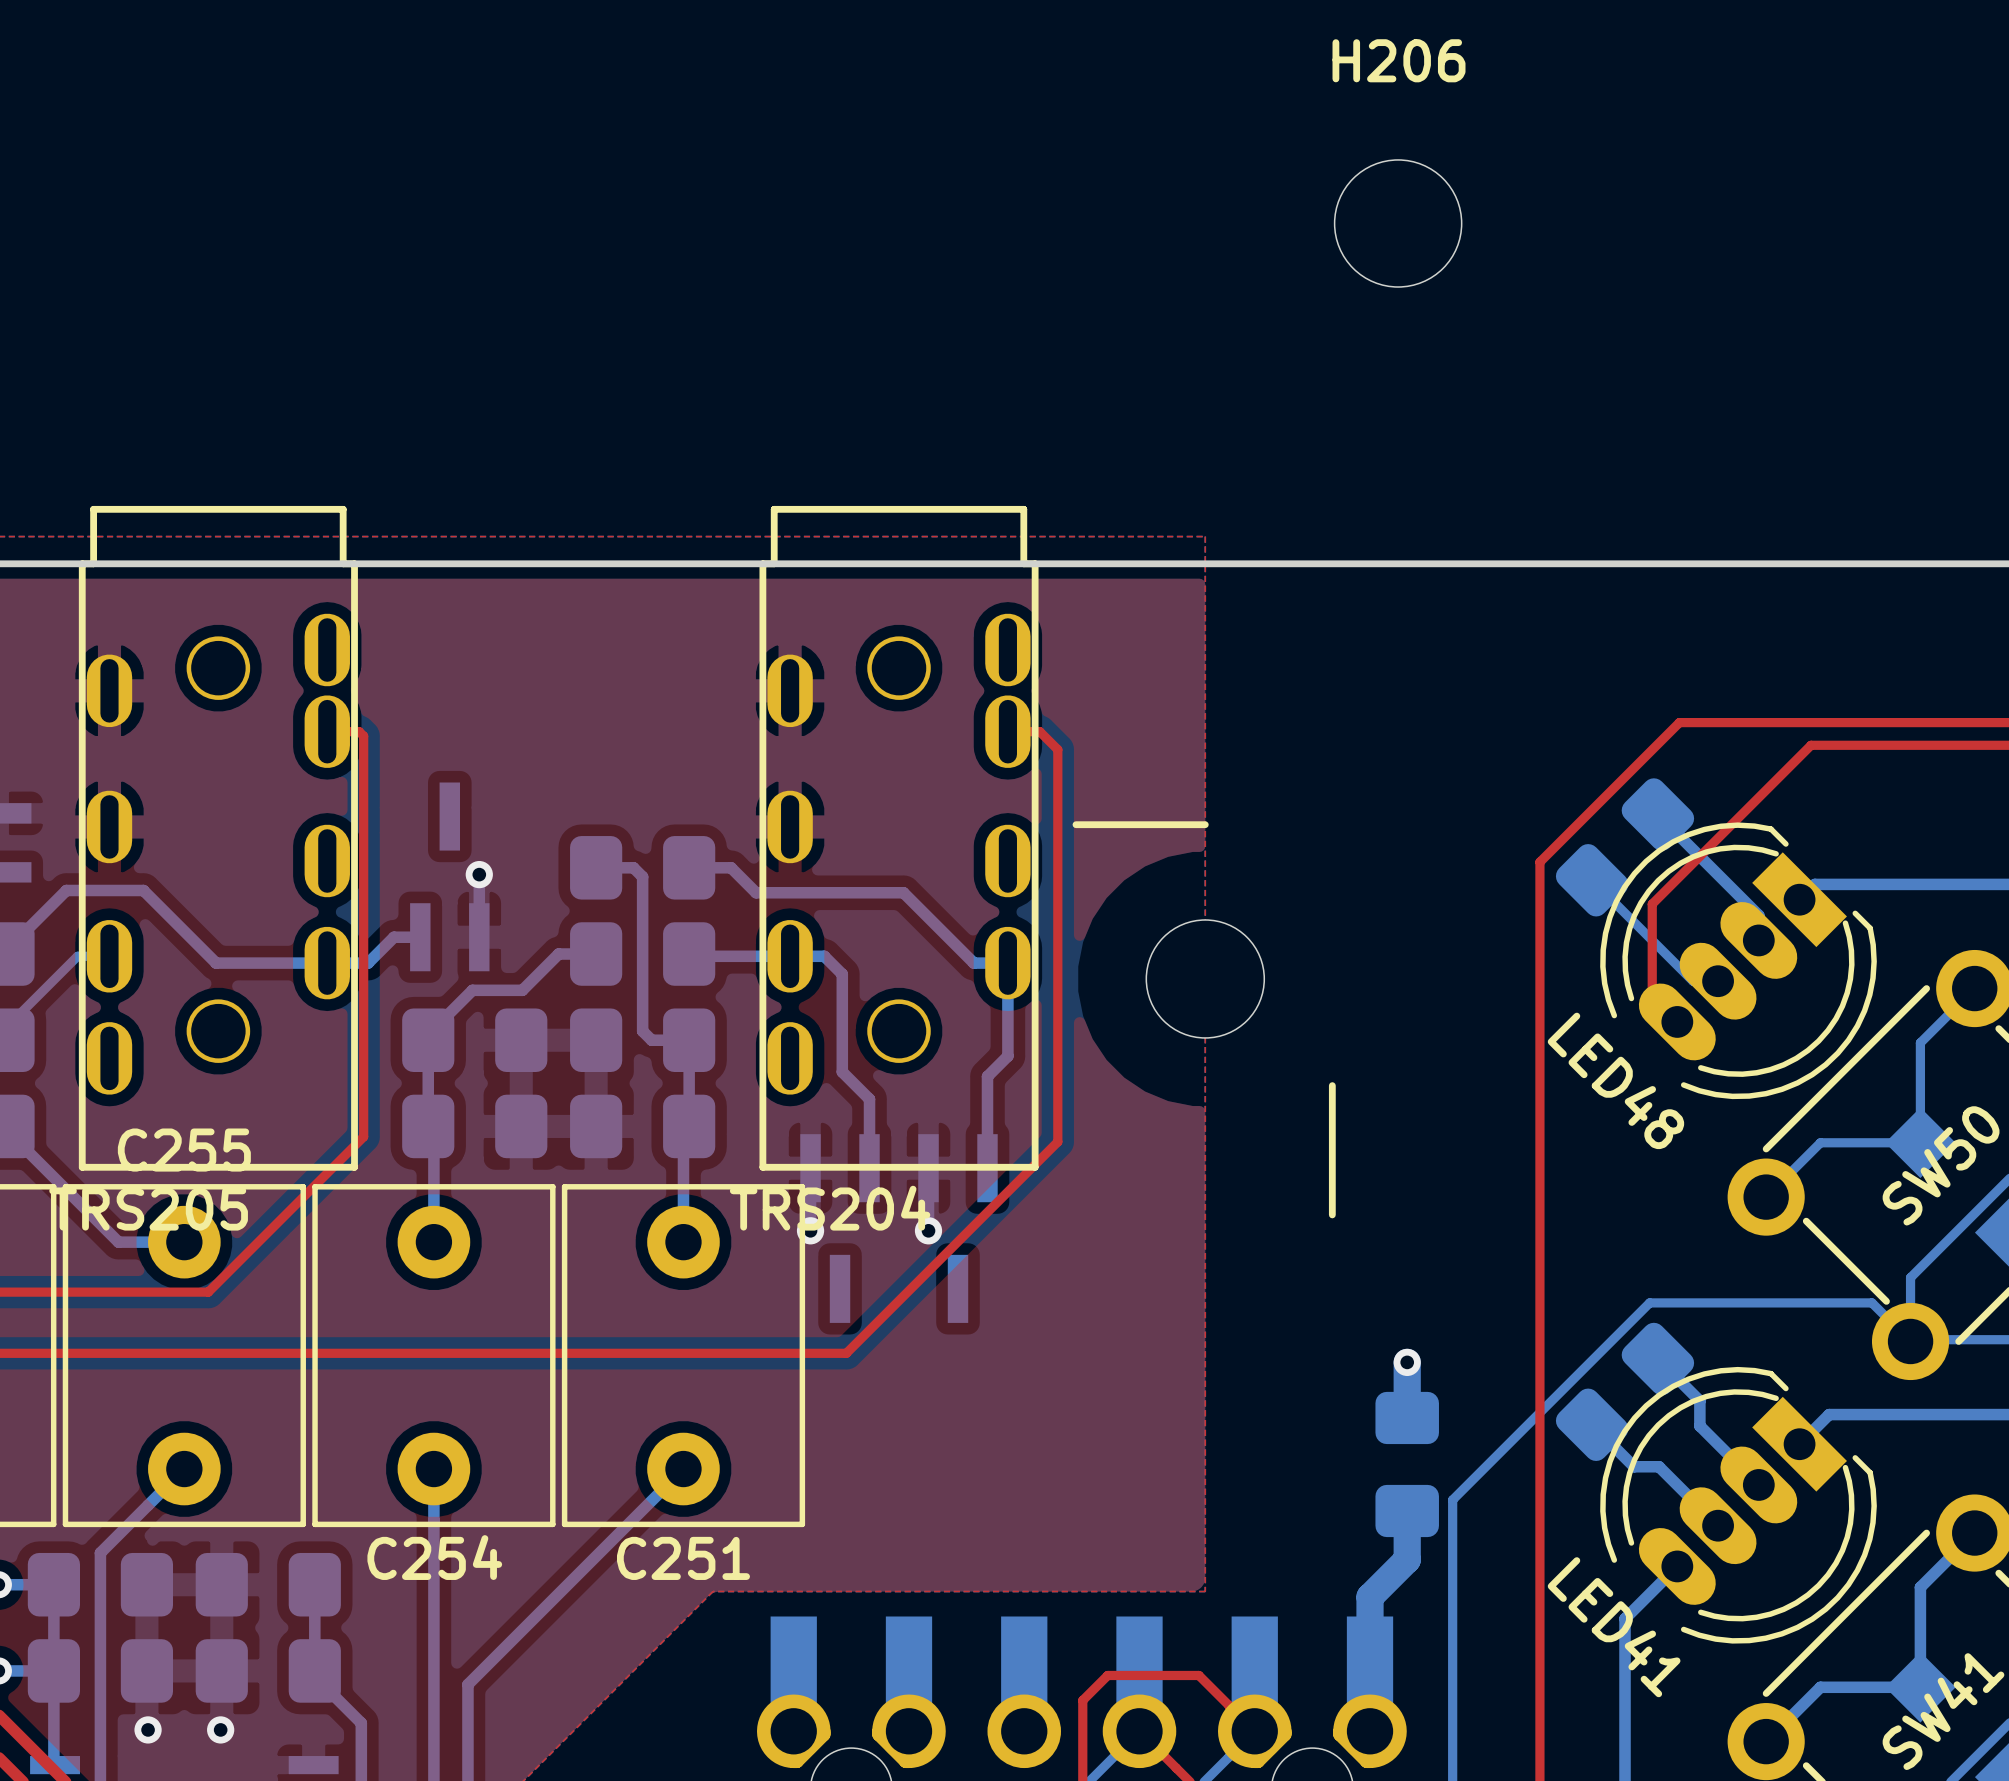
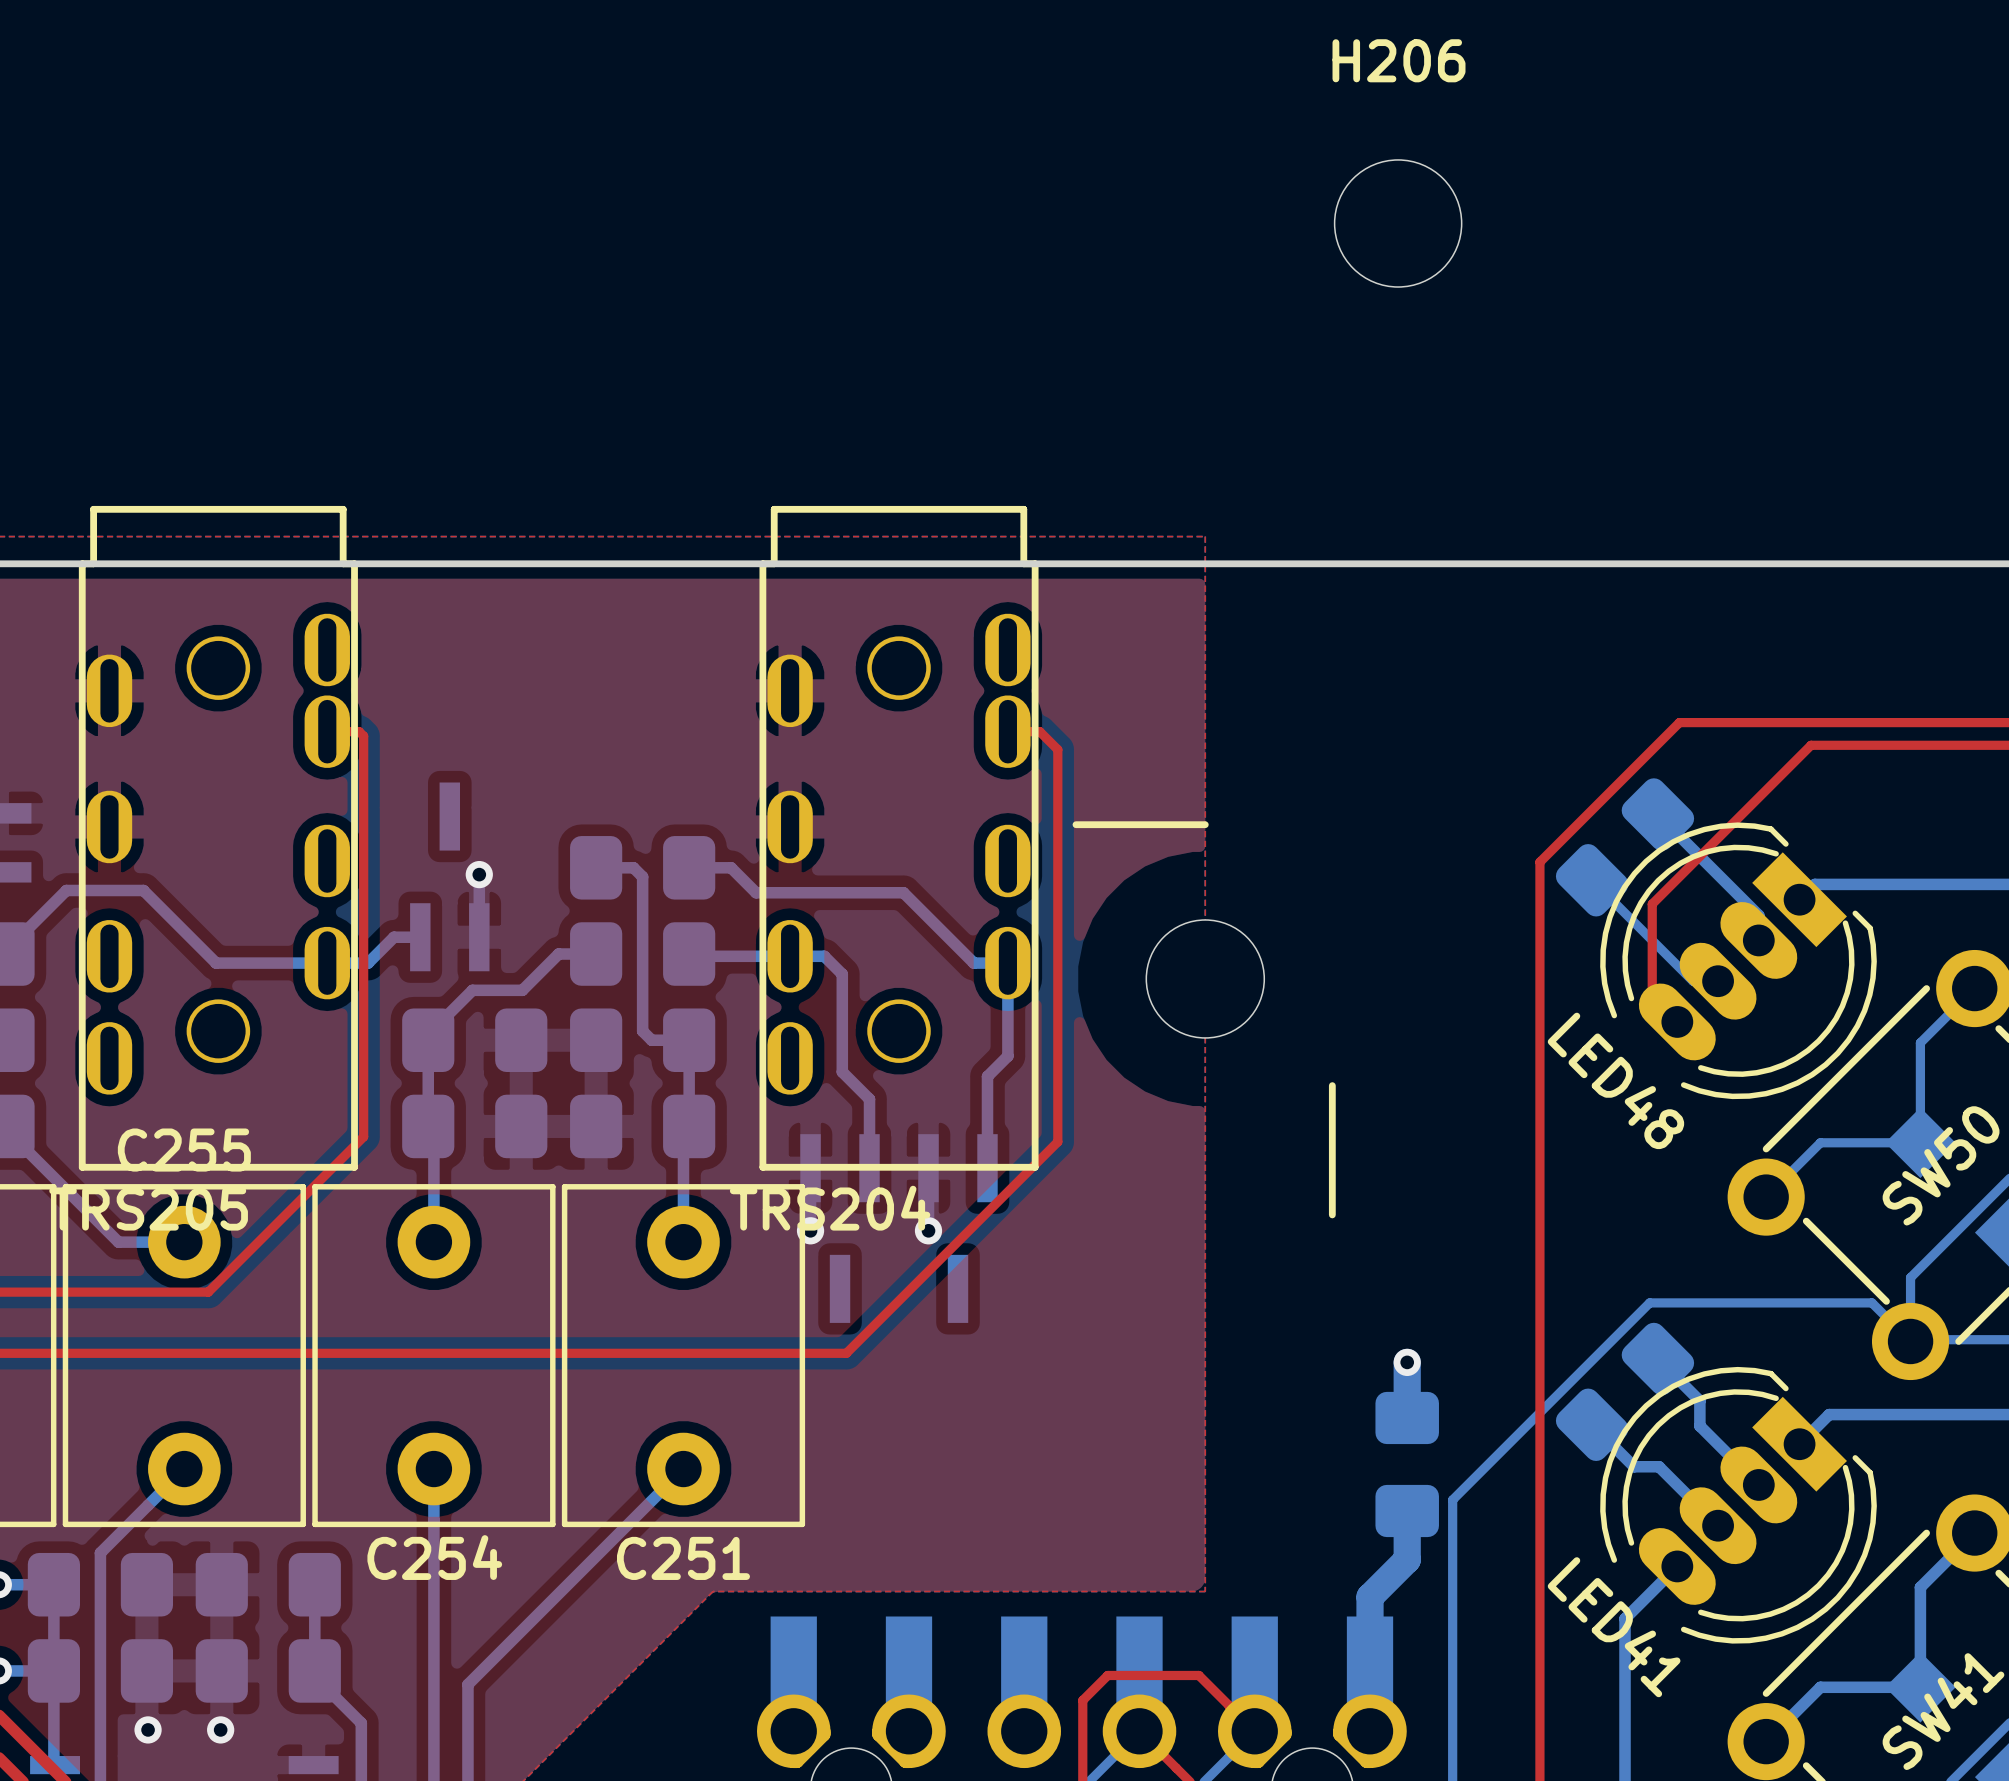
bottom track: (109, 956) (77, 956) (8, 1025) (8, 1040) -> none

